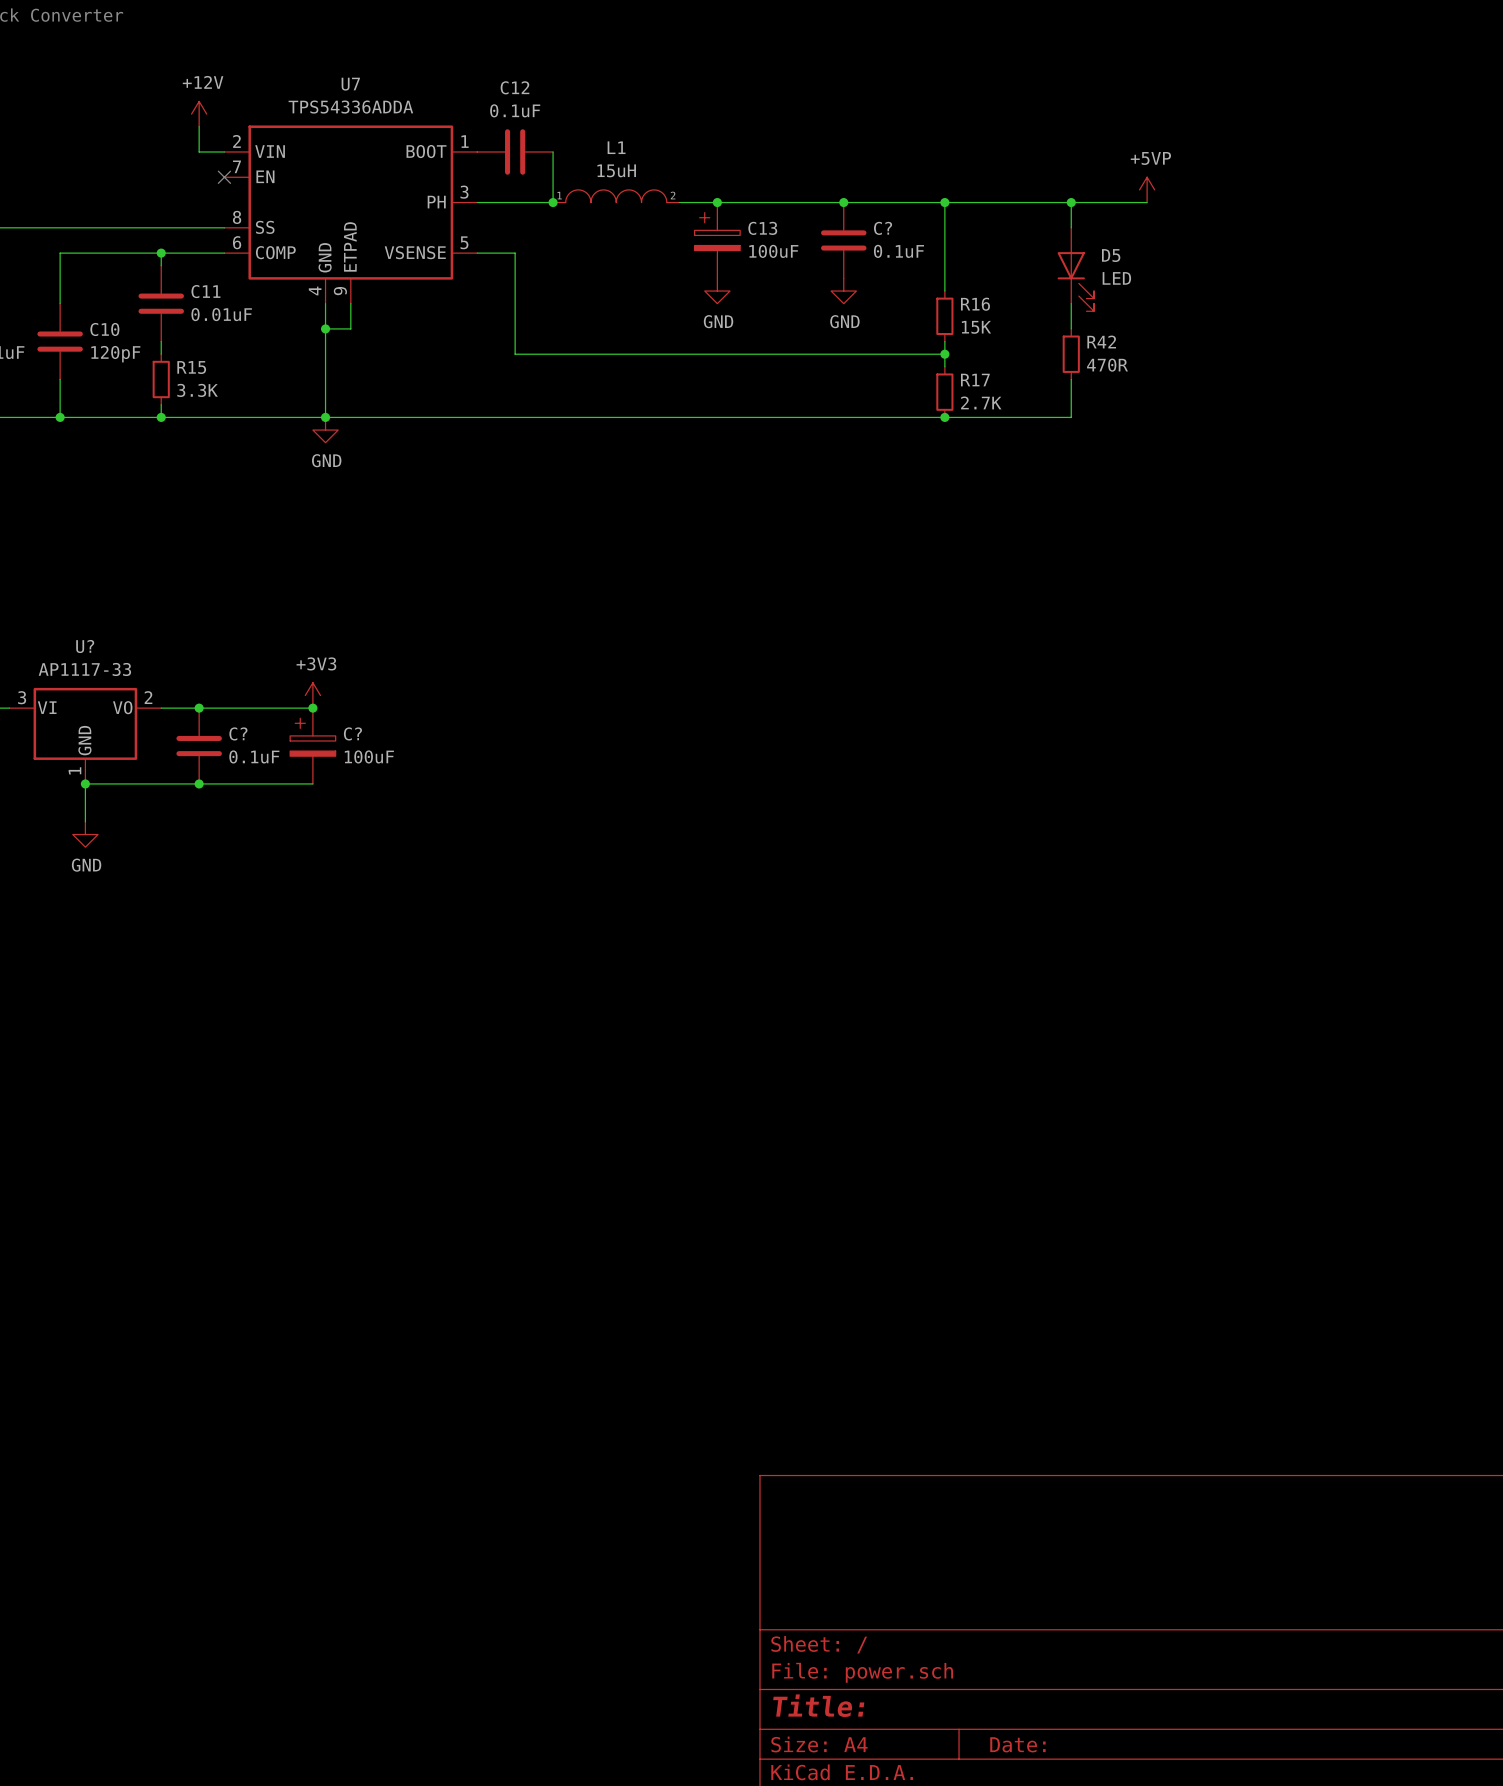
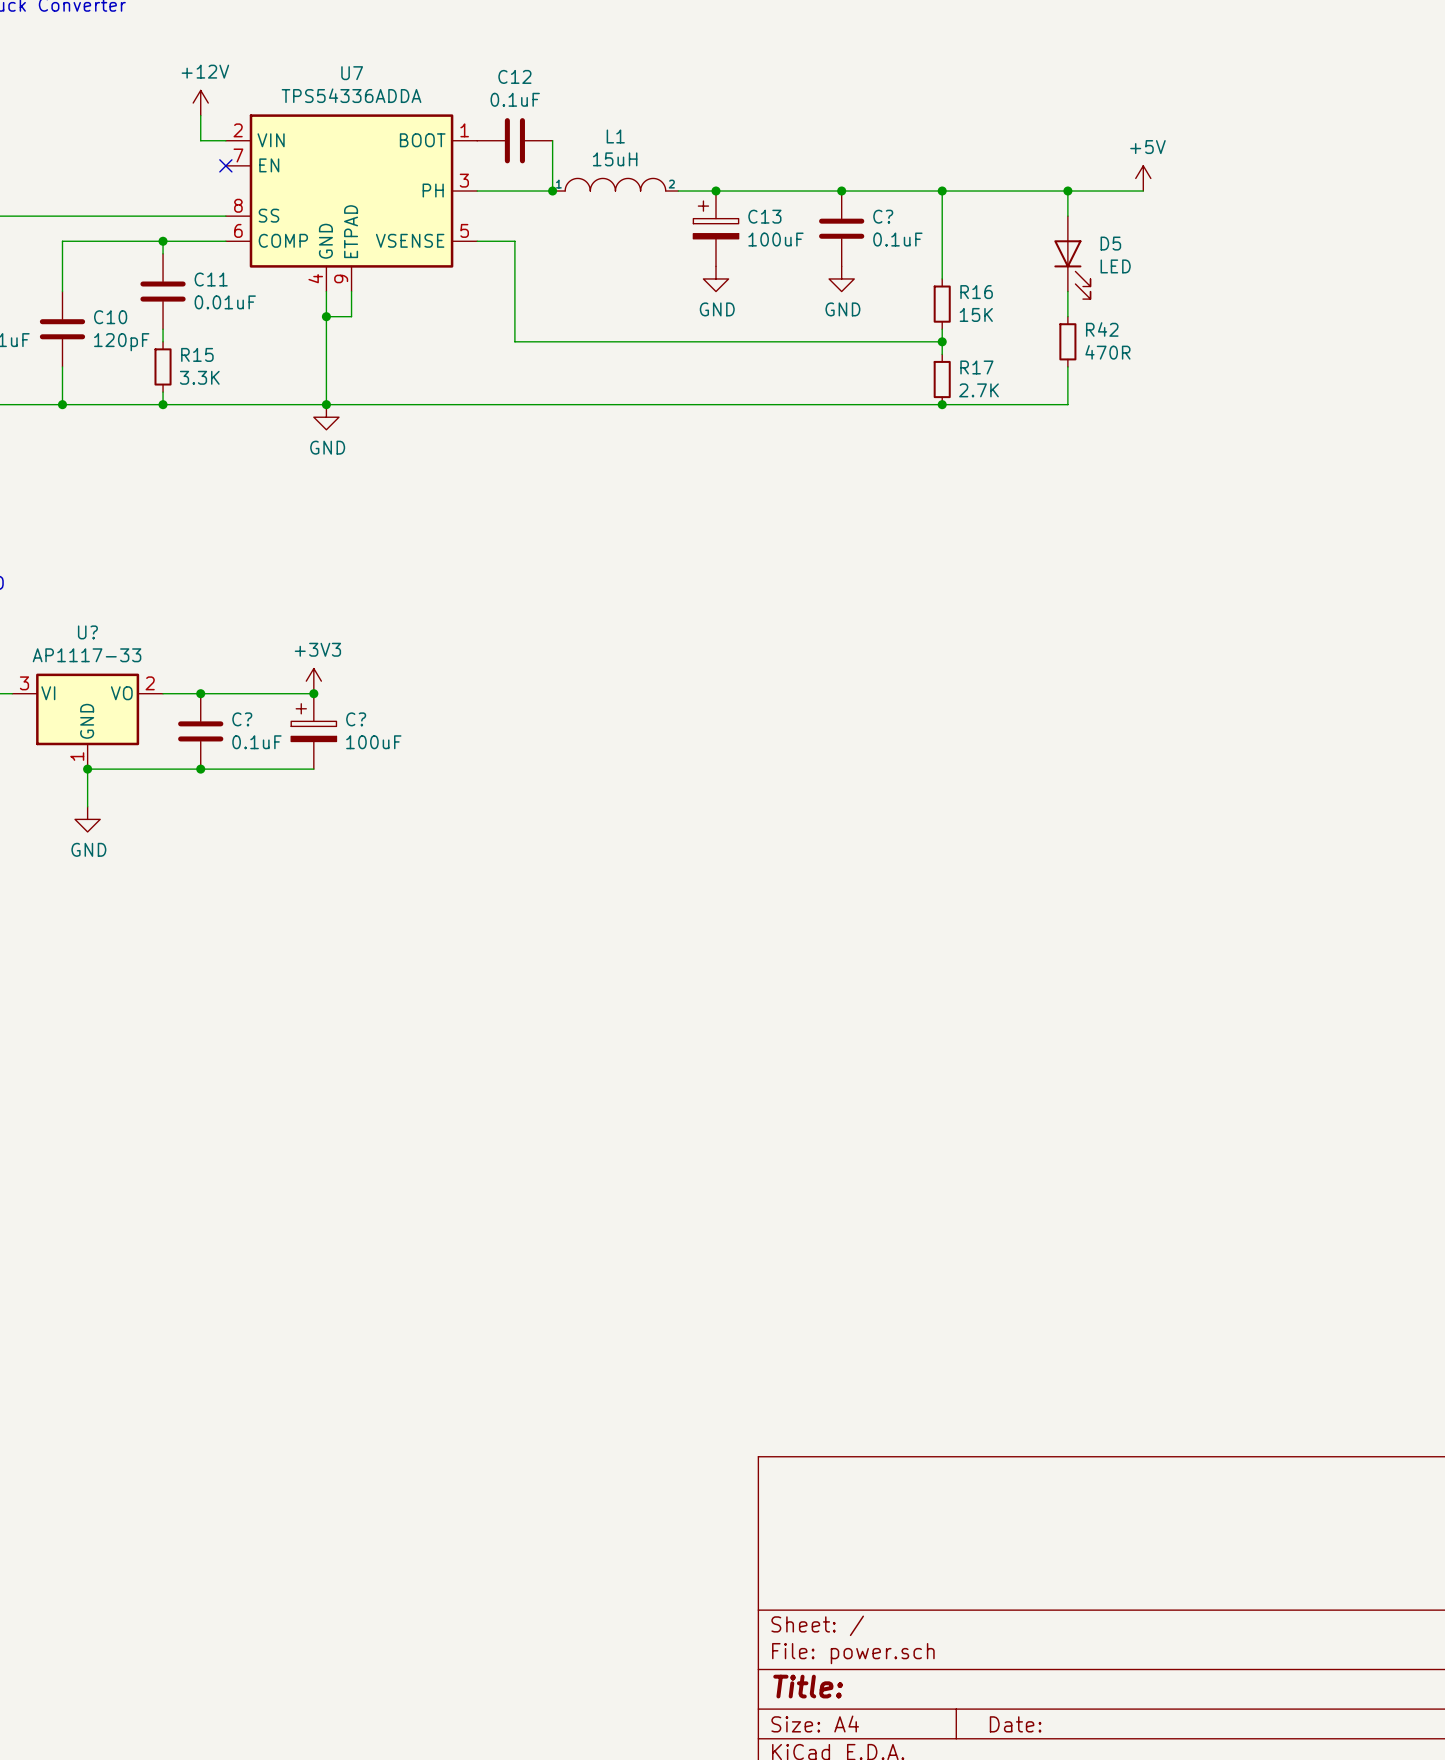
power symbol: +5VP (1147, 189) -> +5V (1143, 178)

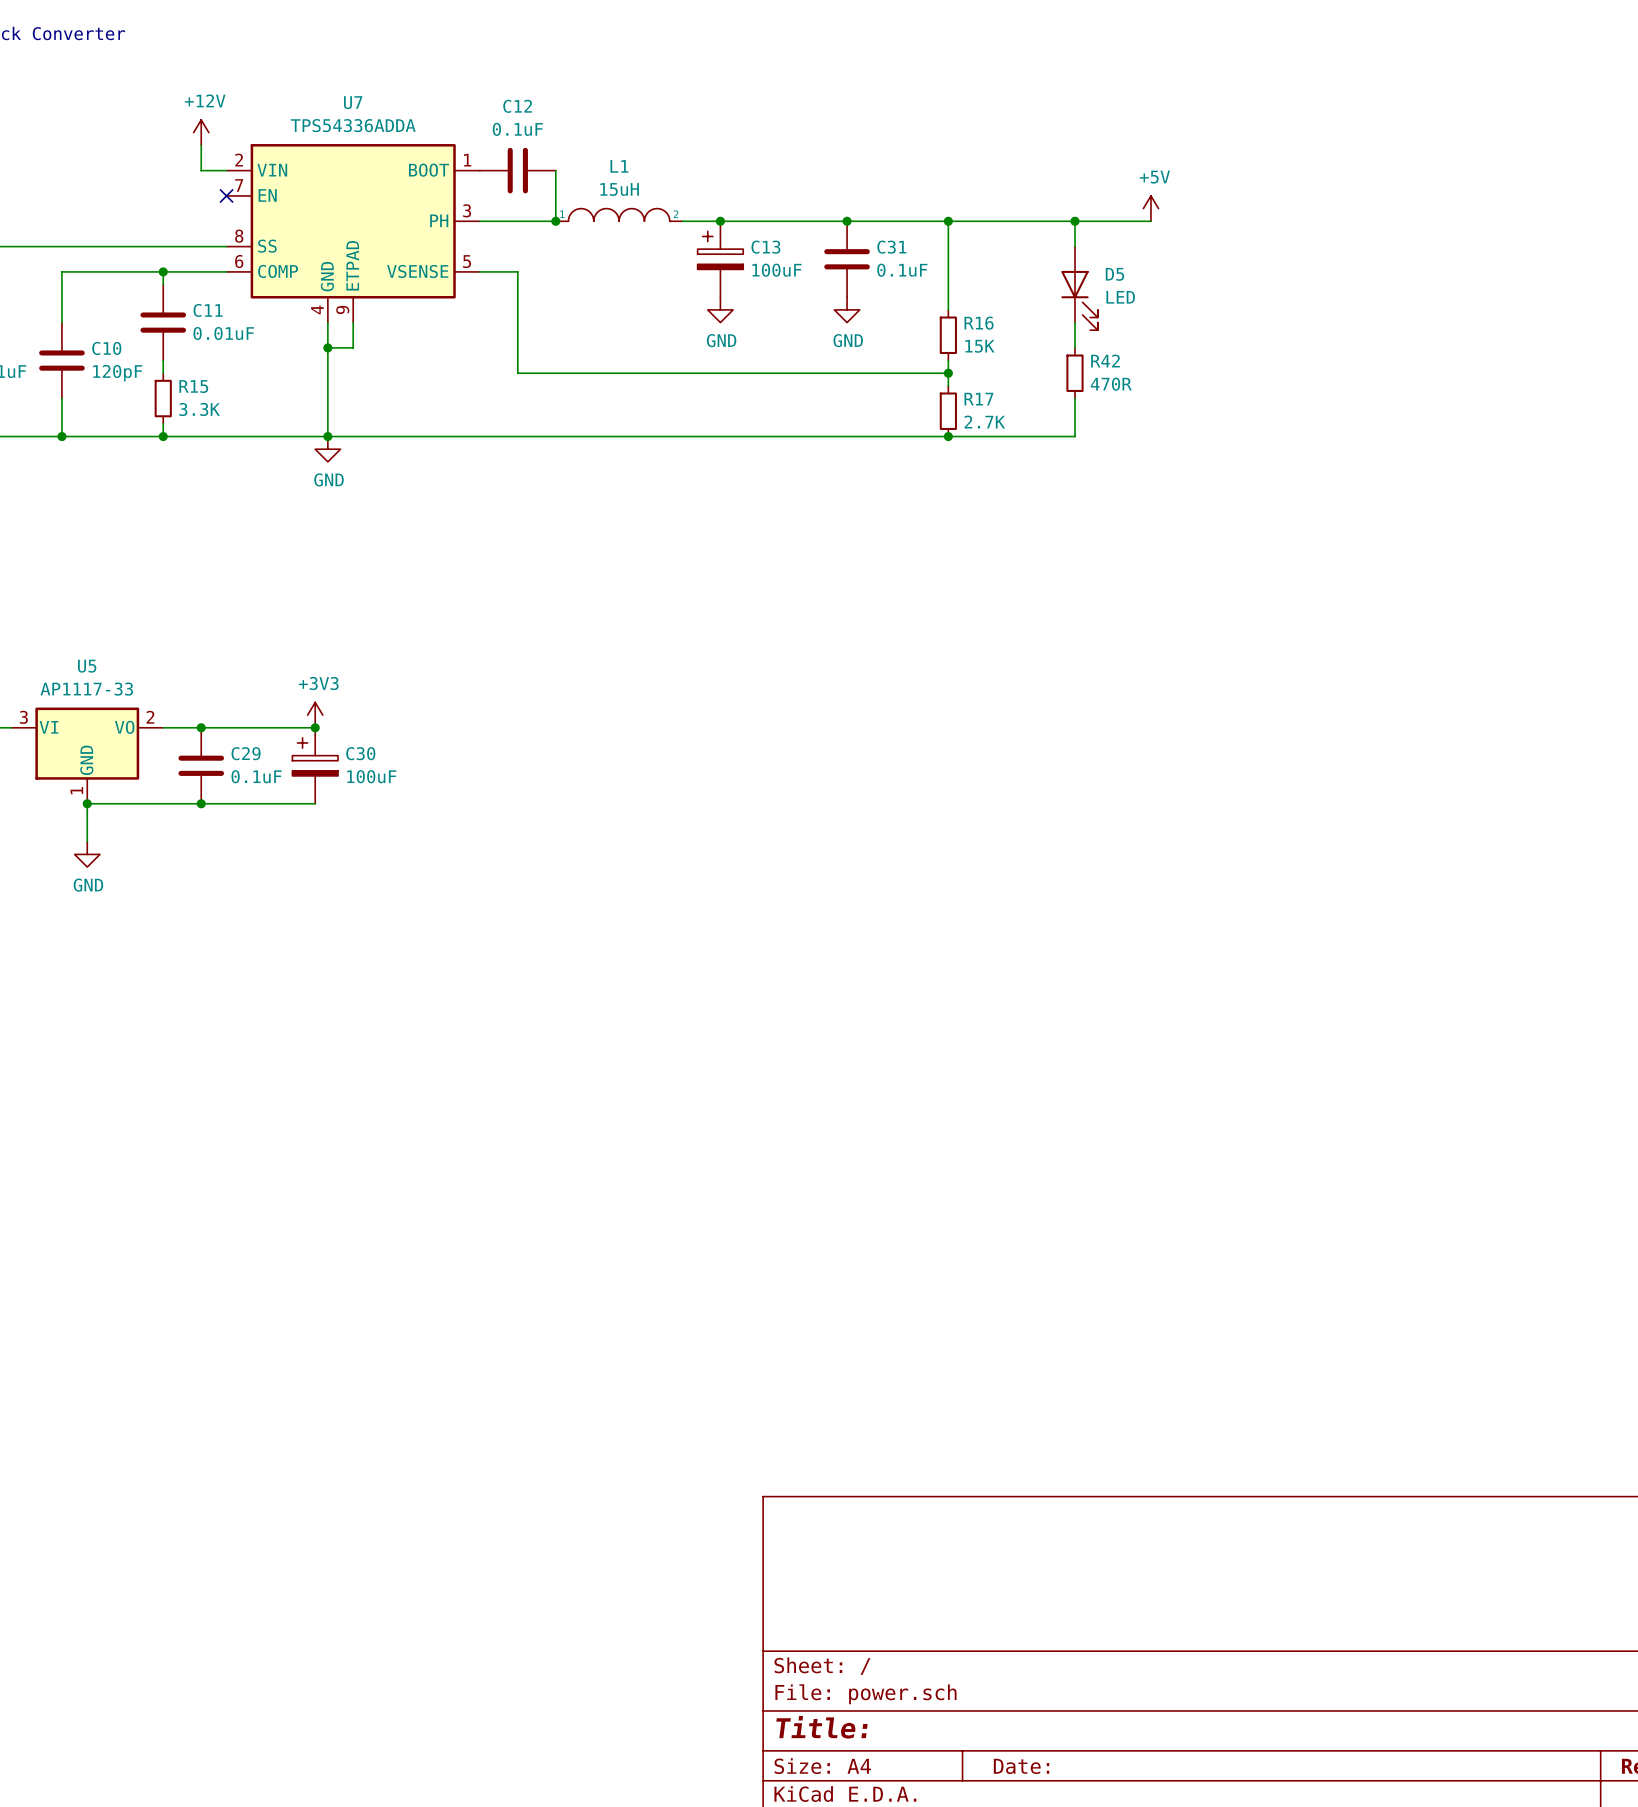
C? name: C? (883, 216) -> C31 (891, 247)
U? name: U? (87, 632) -> U5 (87, 666)
C? name: C? (242, 719) -> C29 (246, 753)
C? name: C? (356, 719) -> C30 (360, 753)

